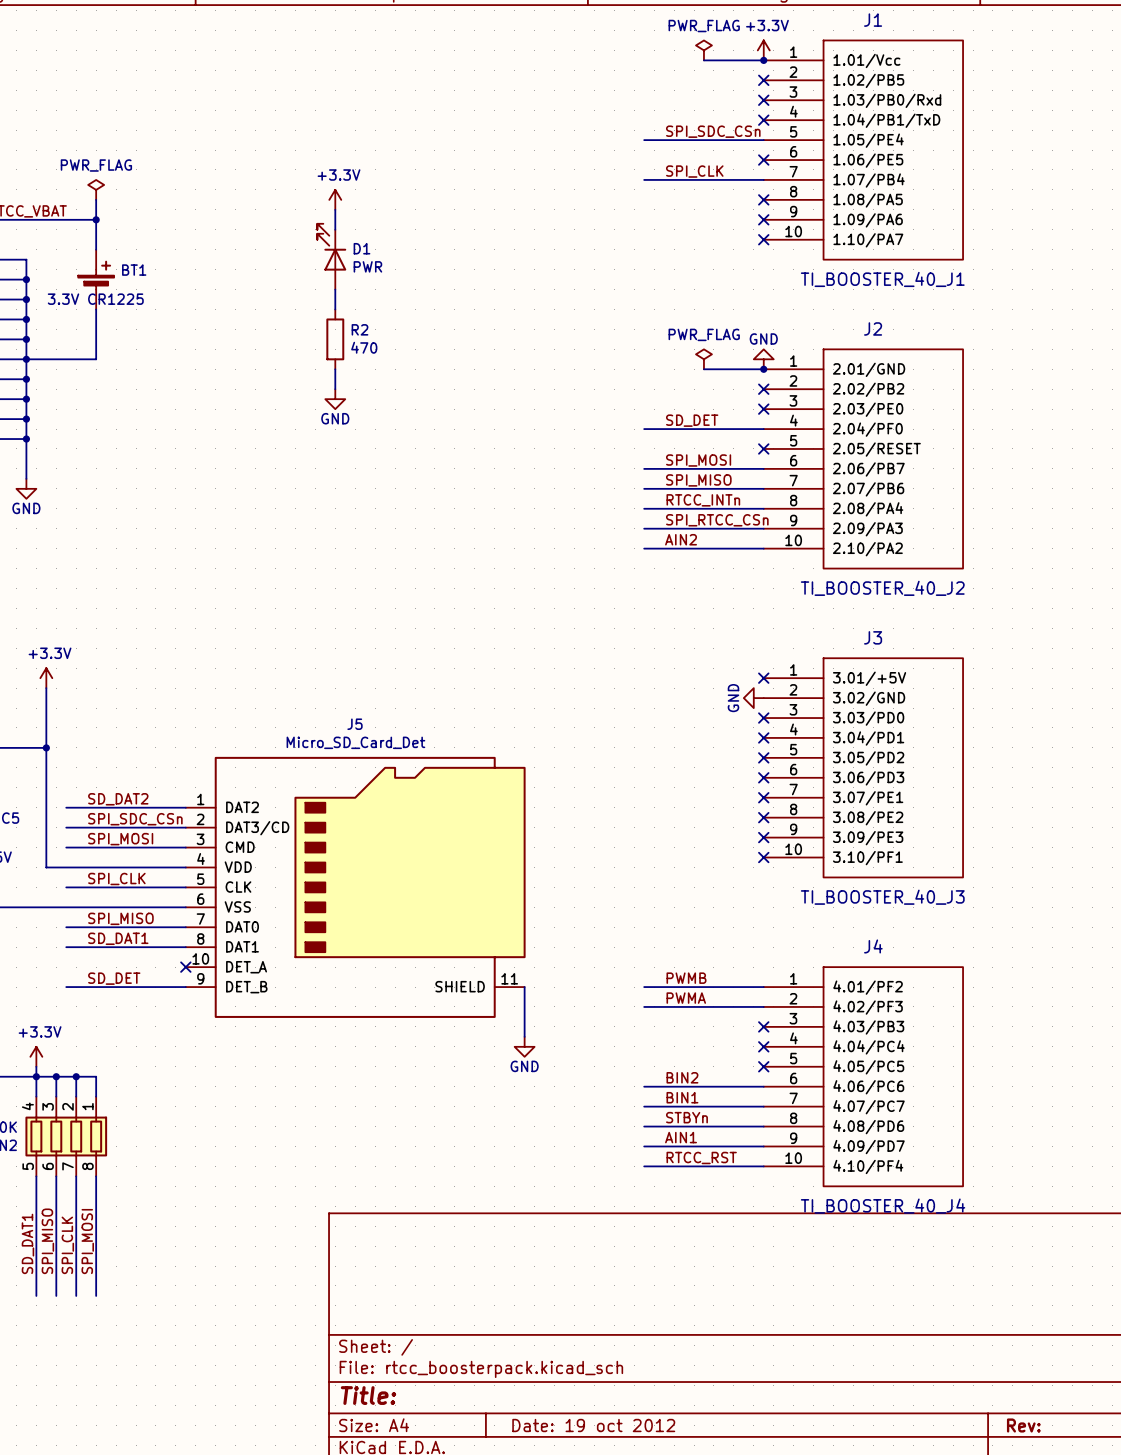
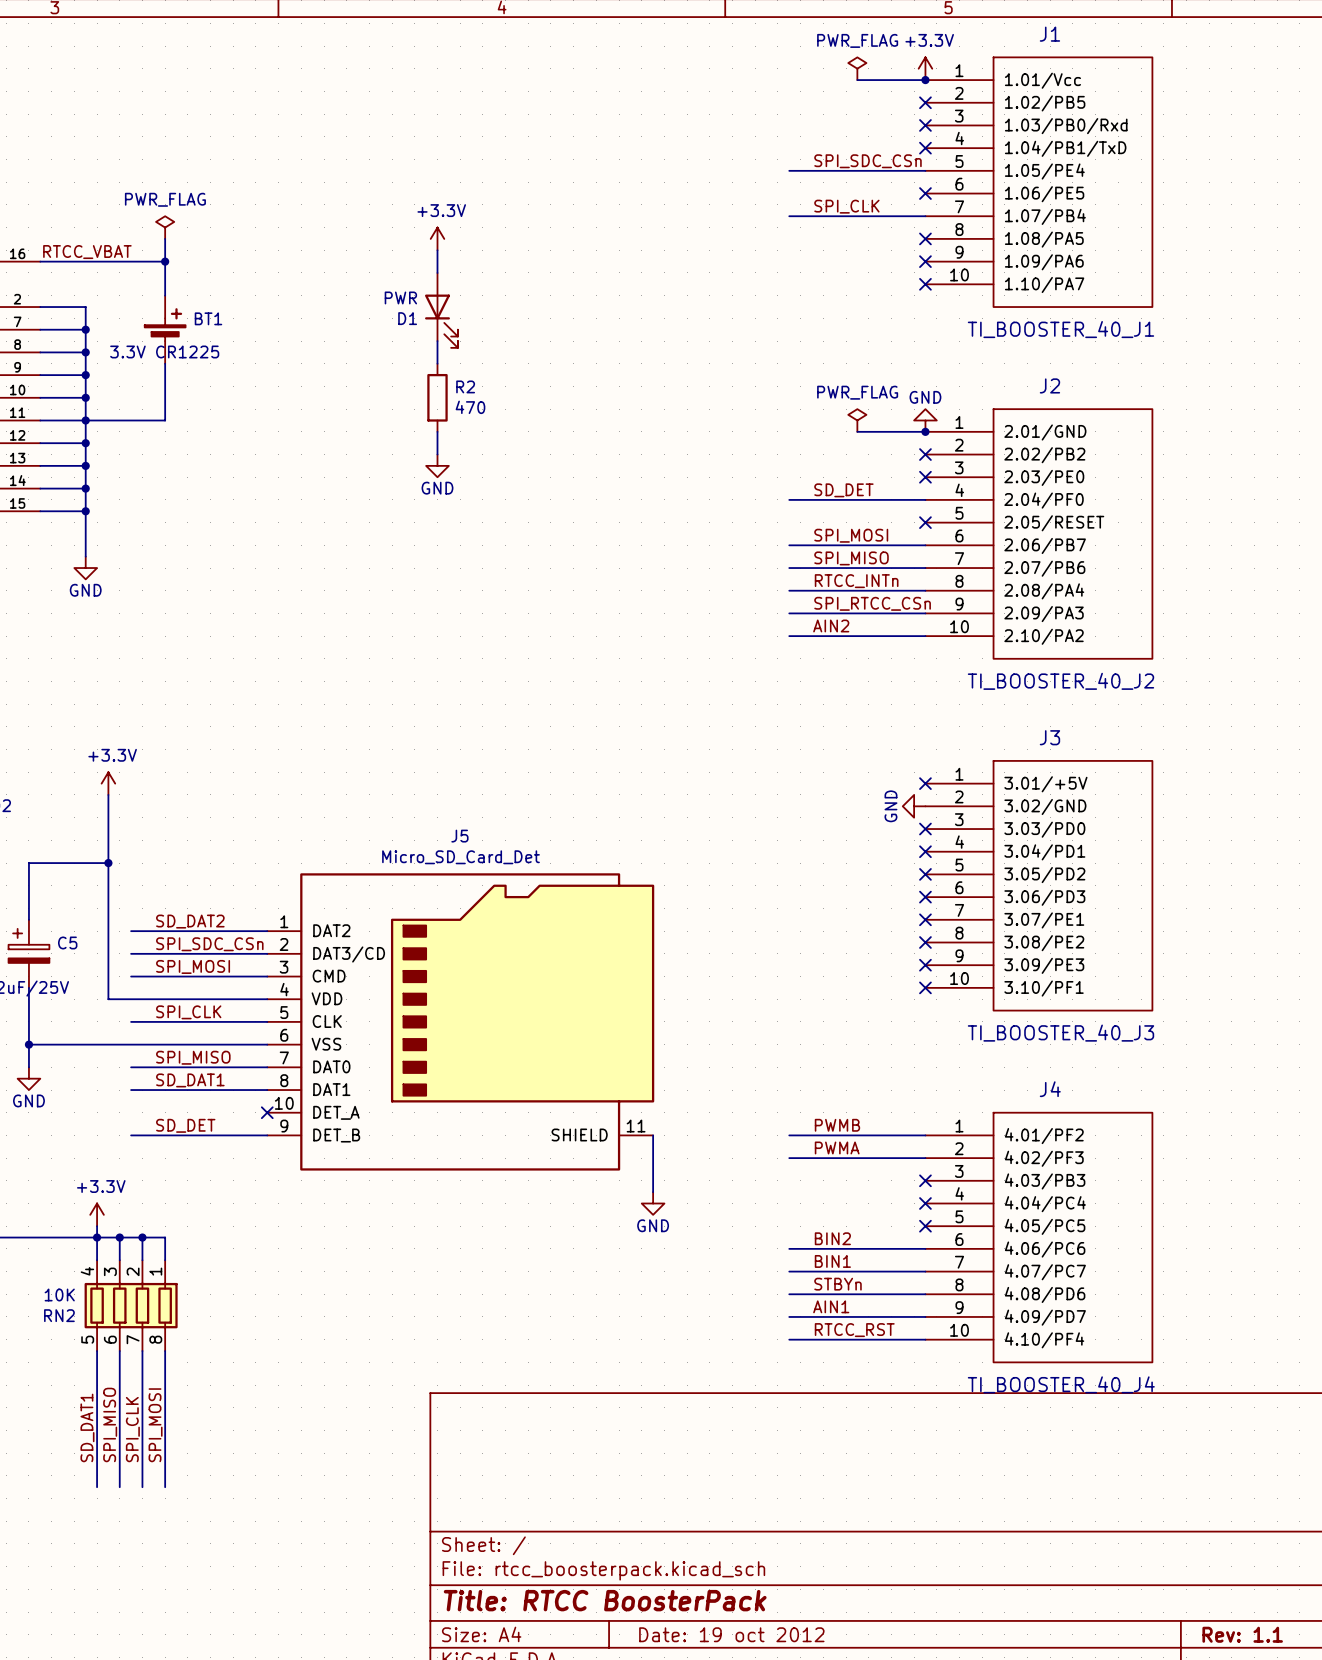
D1 rotation: 0° (331, 247) -> 180° (441, 321)
title block: Title: (368, 1395) -> Title: RTCC BoosterPack (605, 1600)
title block: Rev: (1023, 1425) -> Rev: 1.1 (1242, 1634)

